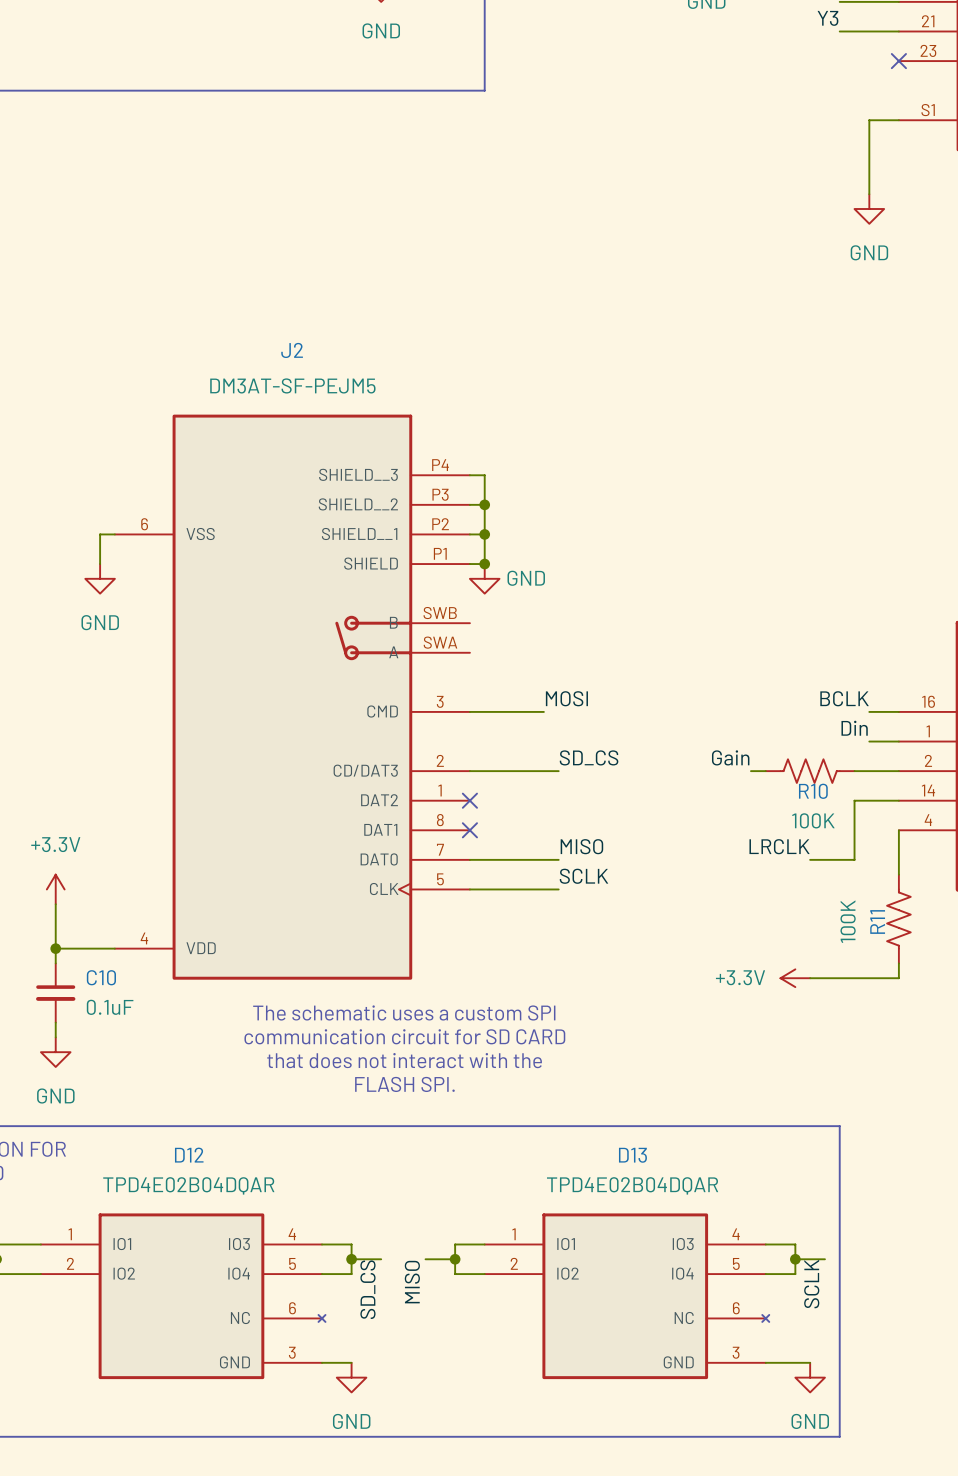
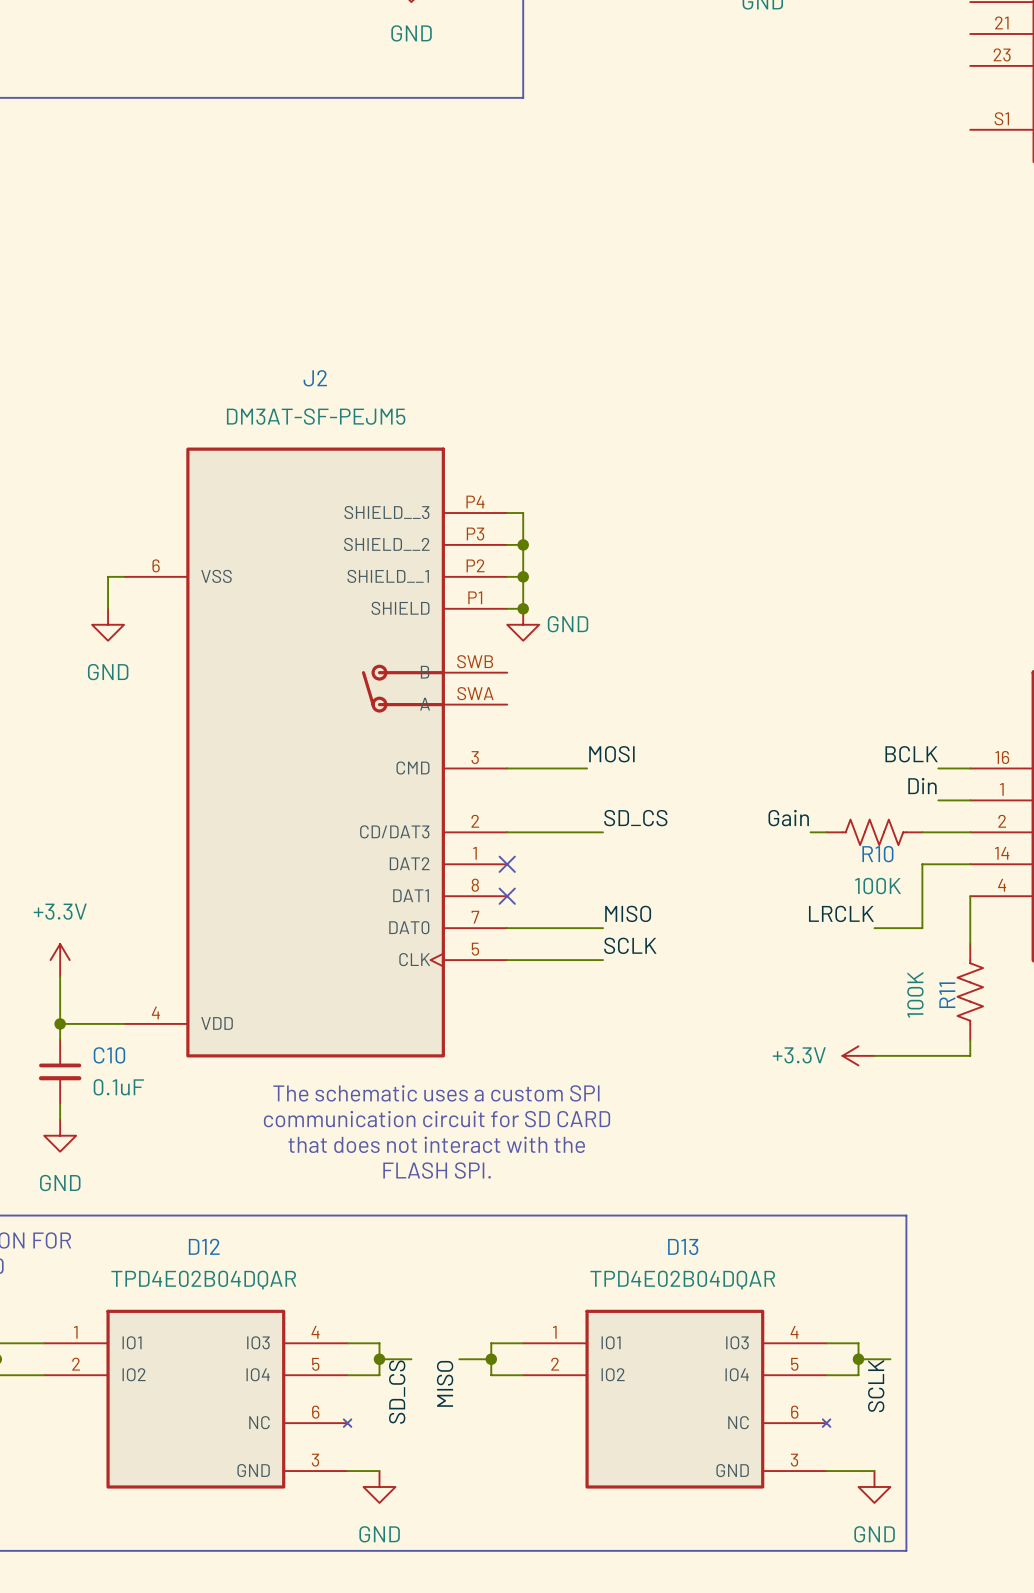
wire: (839, 1) (898, 1) -> none
label: Y3 (828, 18) -> none
wire: (839, 31) (898, 31) -> none
no-connect mark: (898, 61) -> none
wire: (898, 120) (869, 120) (869, 194) -> none
power symbol: GND (869, 209) -> none

